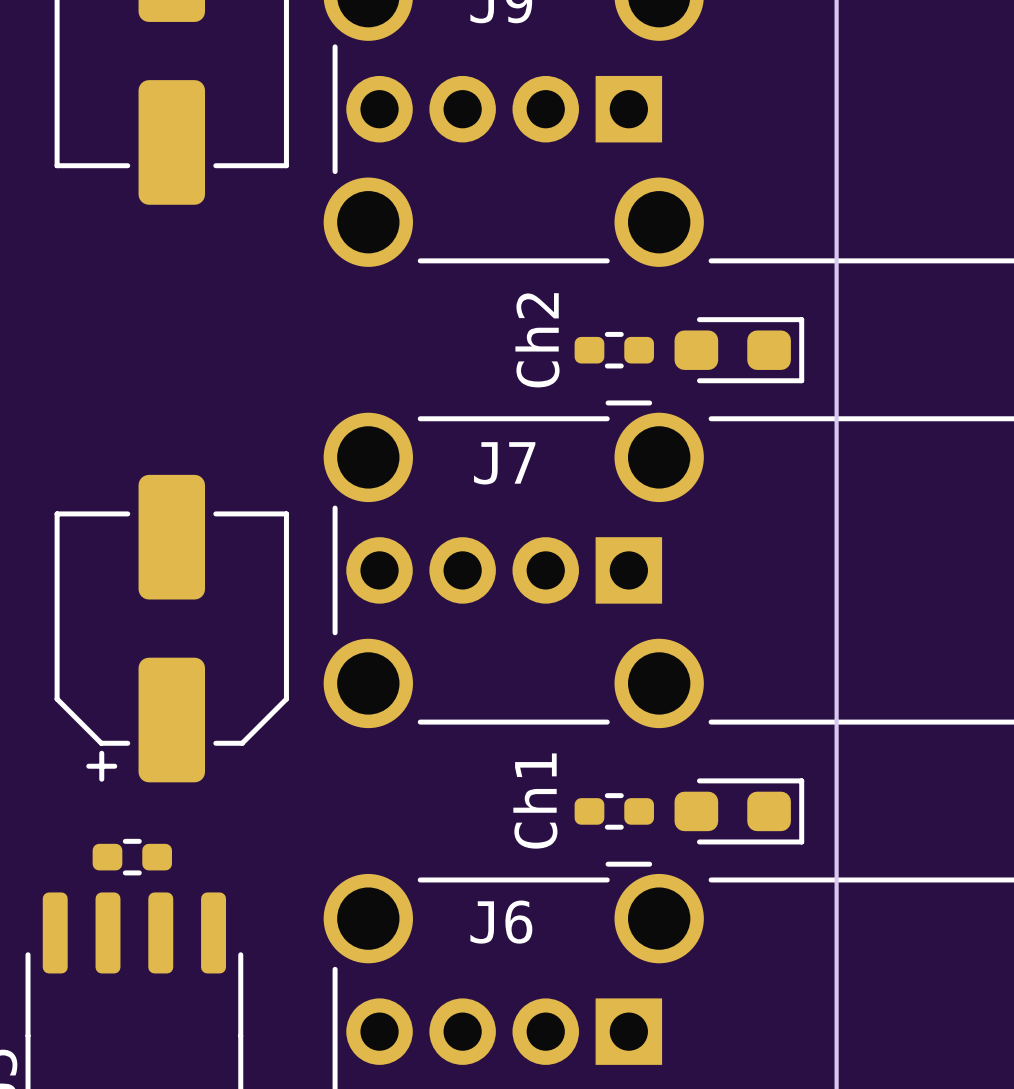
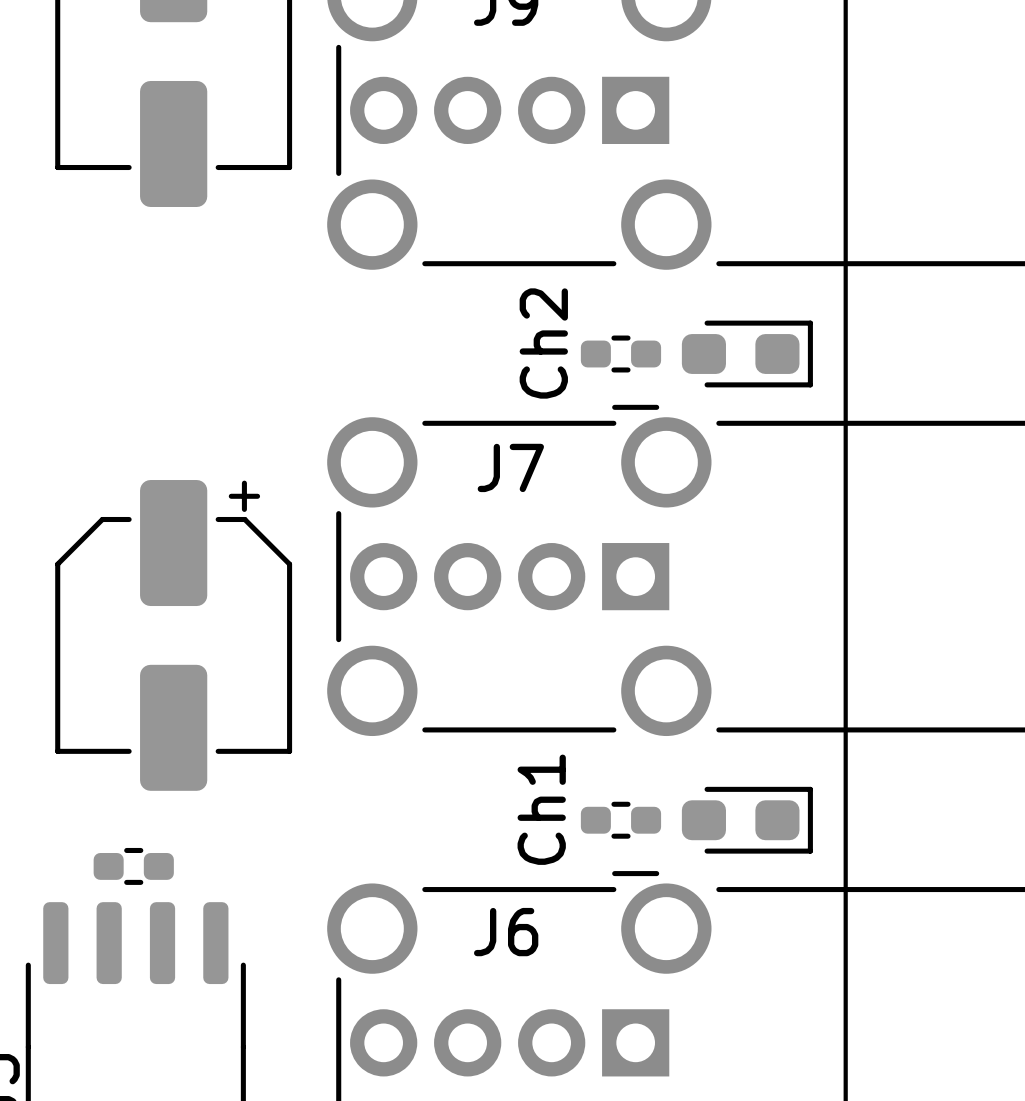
part rotation: 0° (171, 628) -> 180° (173, 635)

